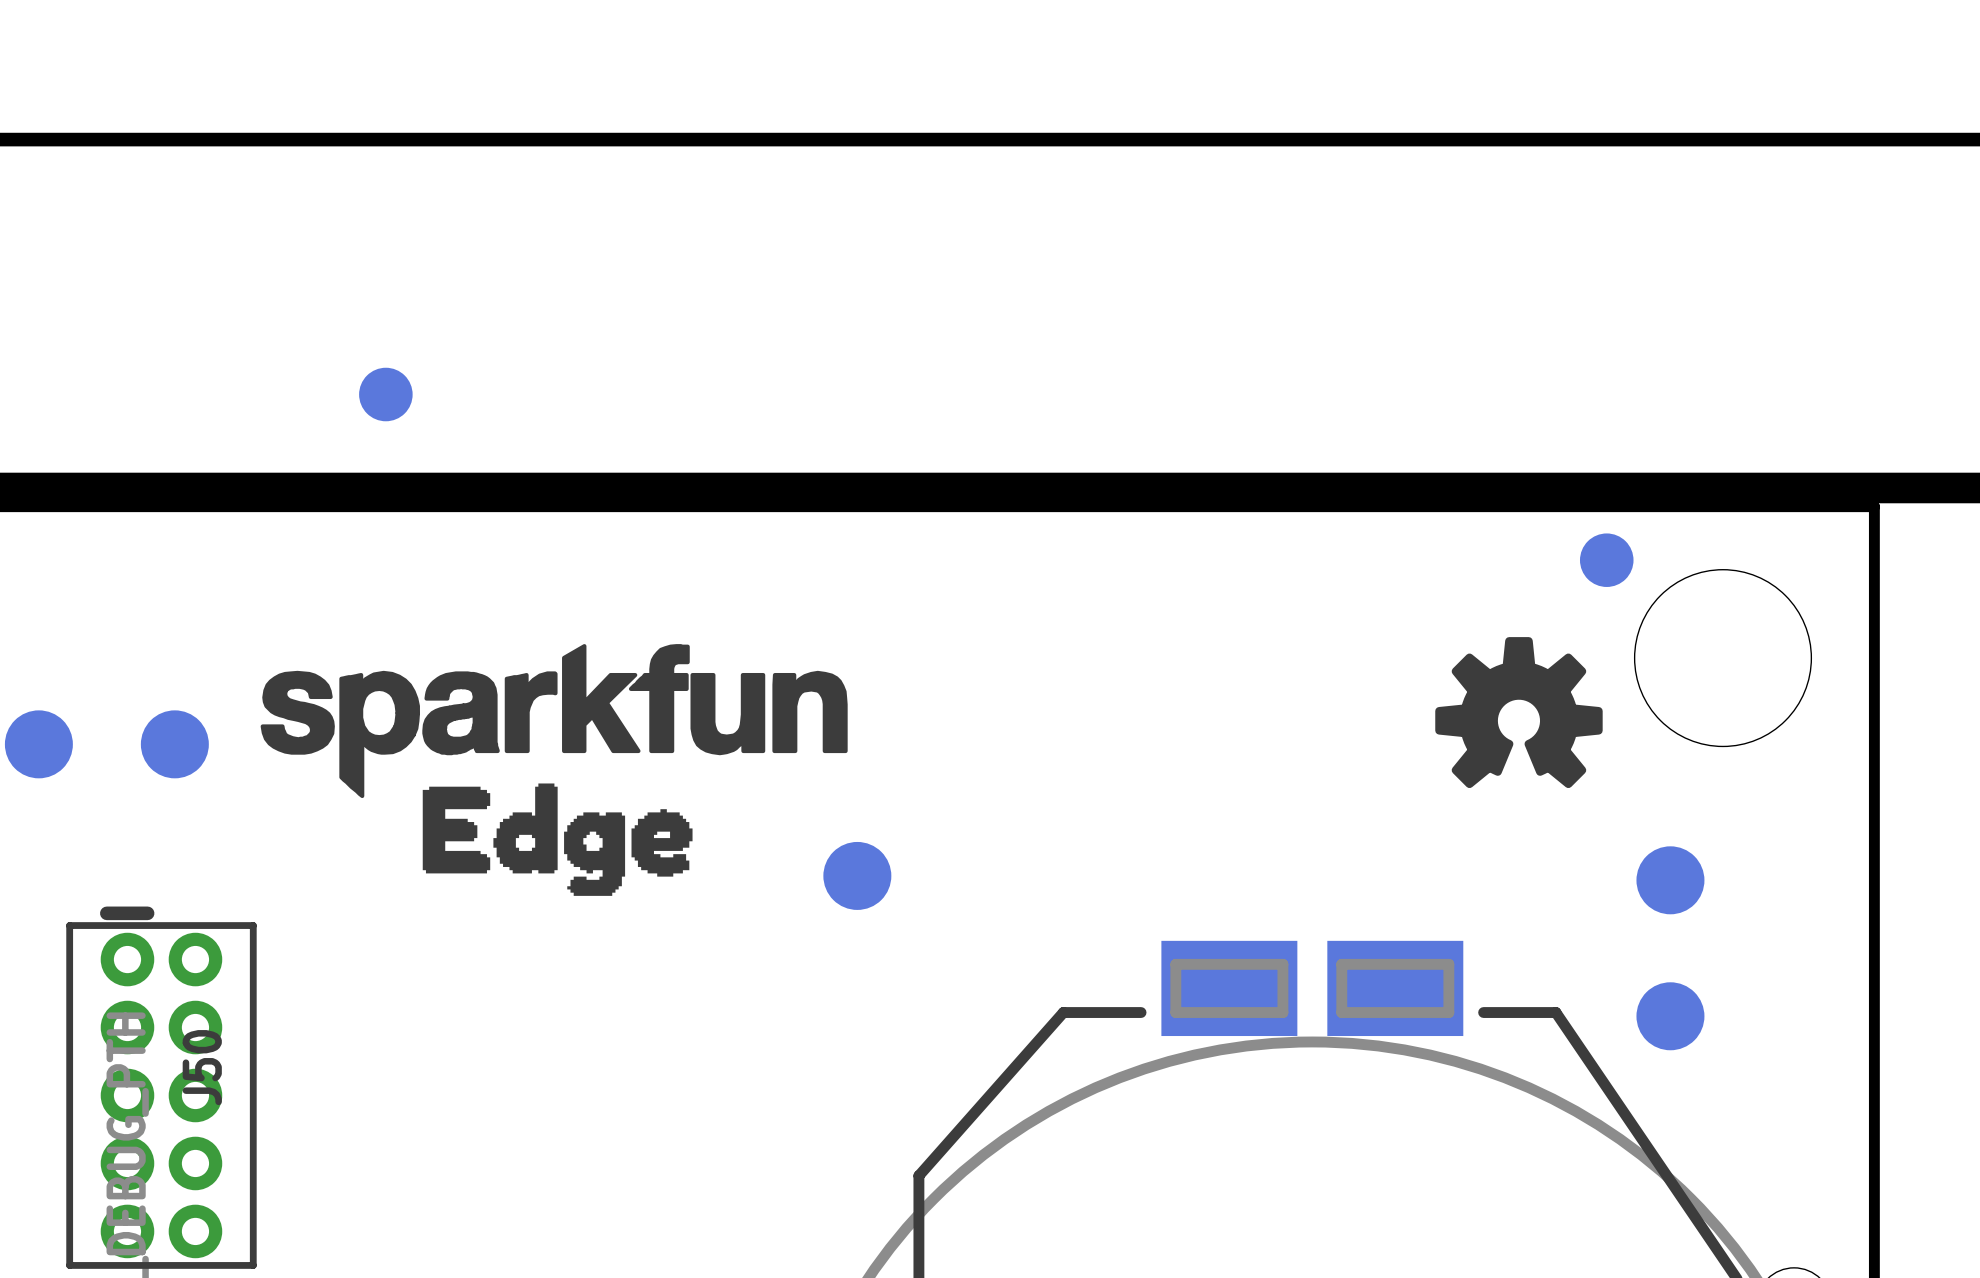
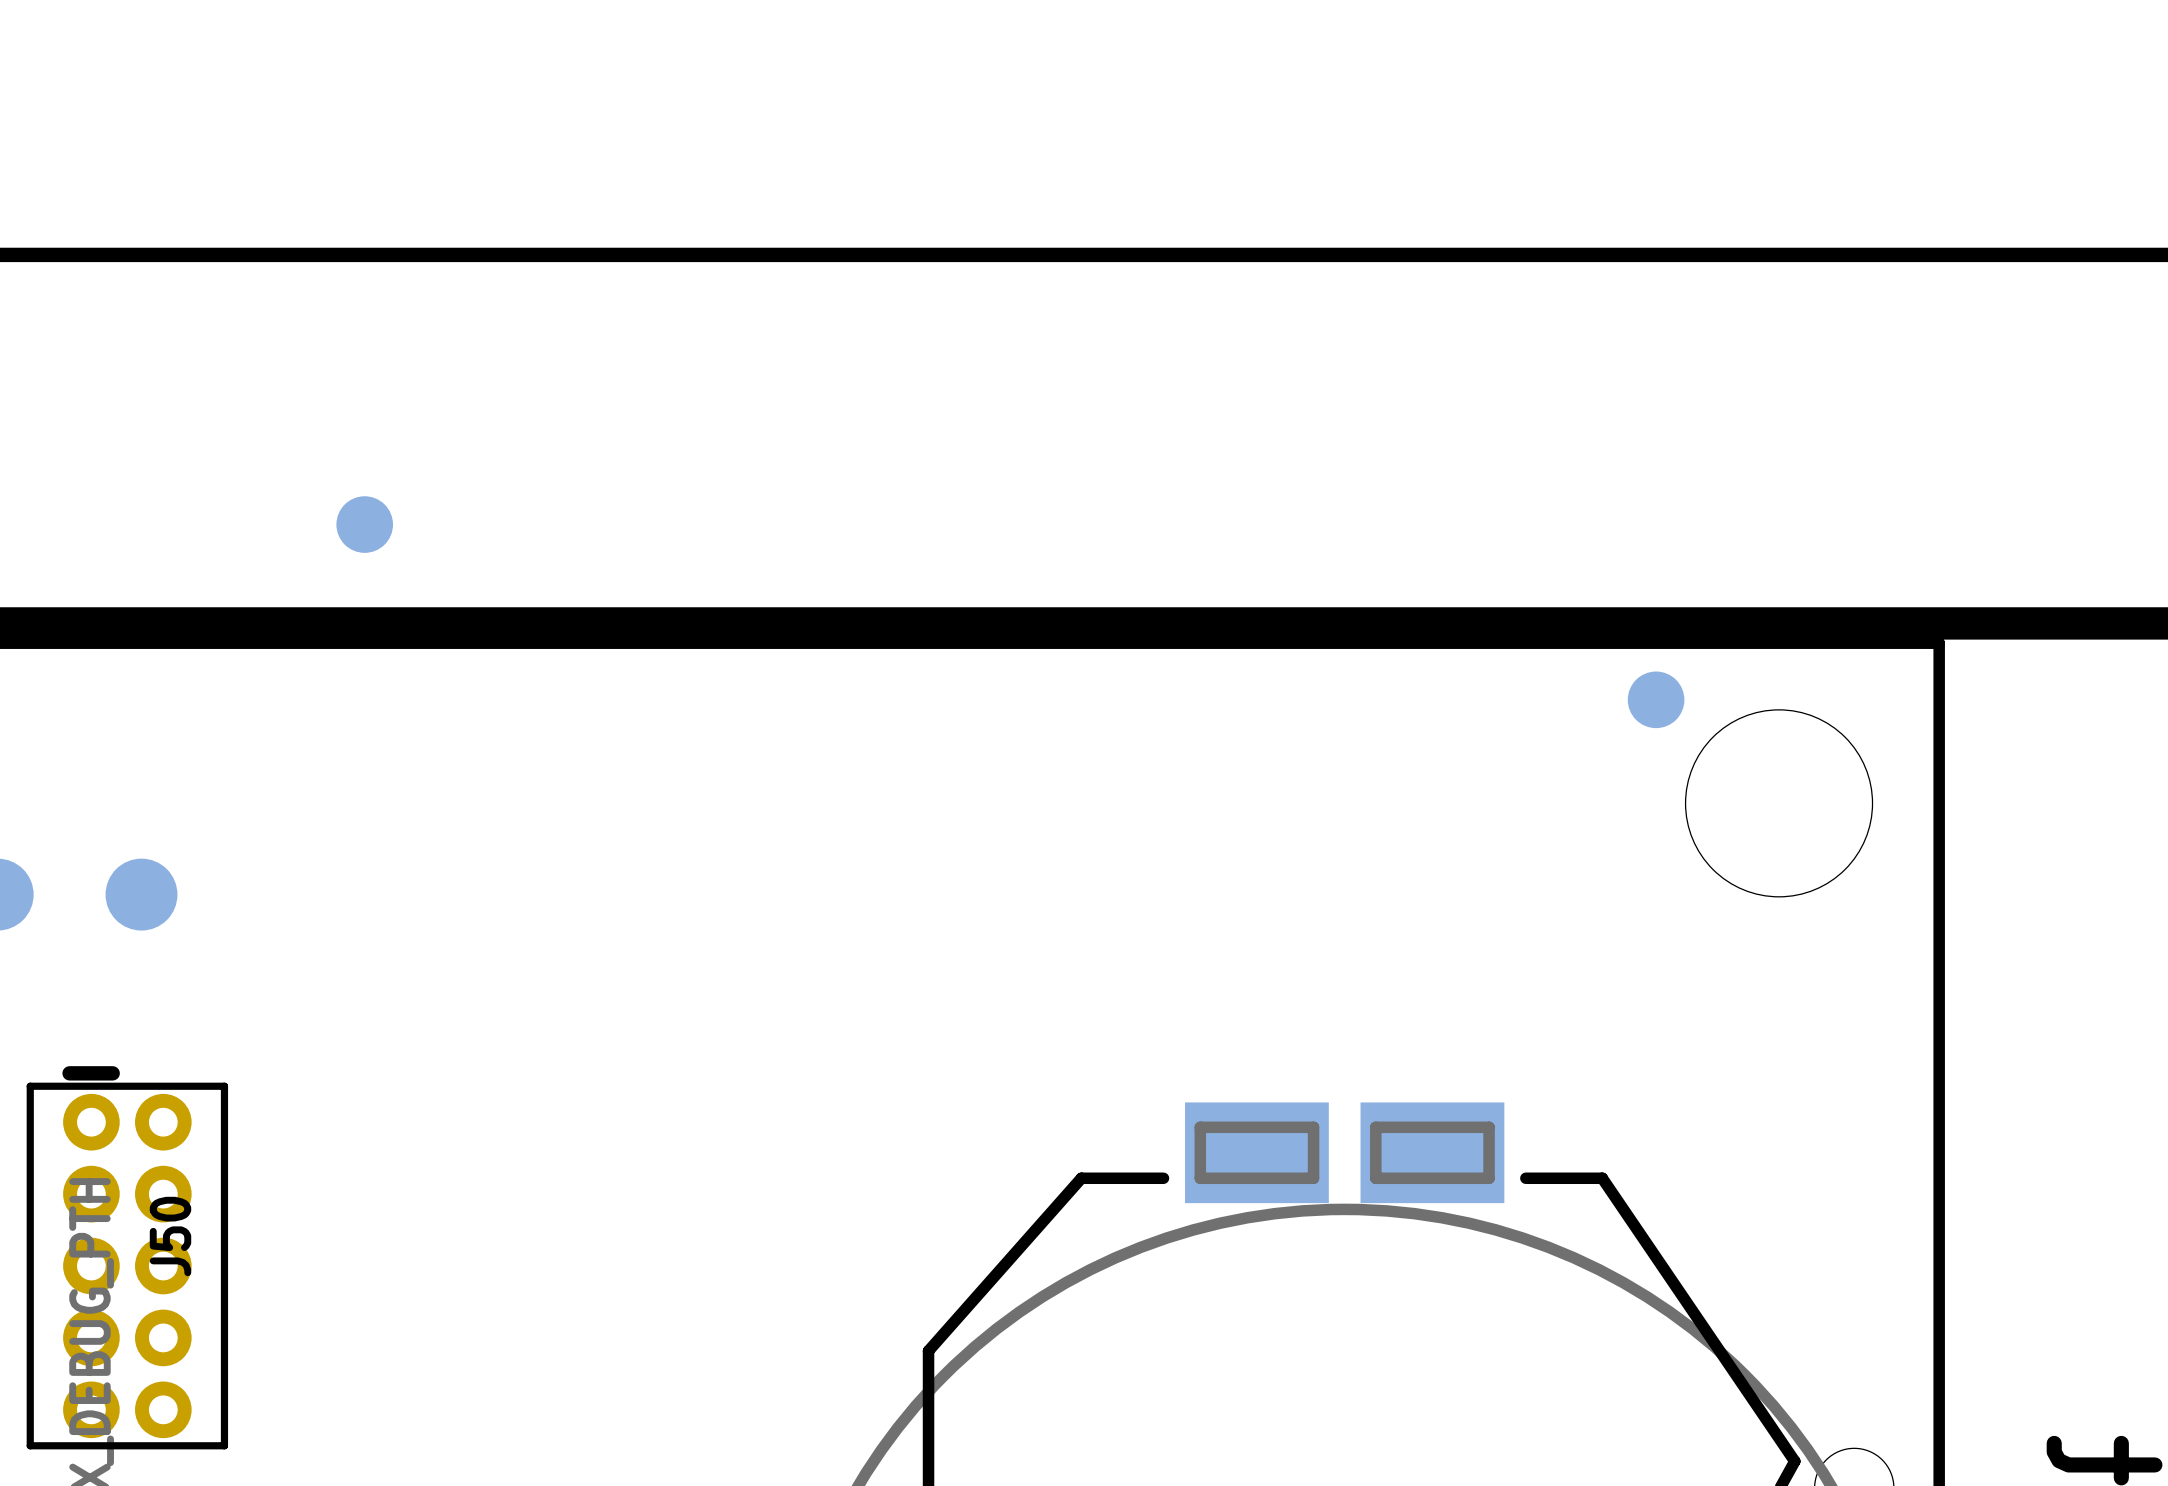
drawing: [1435, 637, 1603, 789] -> none
drawing: [260, 644, 848, 896] -> none
part: (857, 875) -> none
part: (1670, 880) -> none
part: (1670, 1016) -> none

